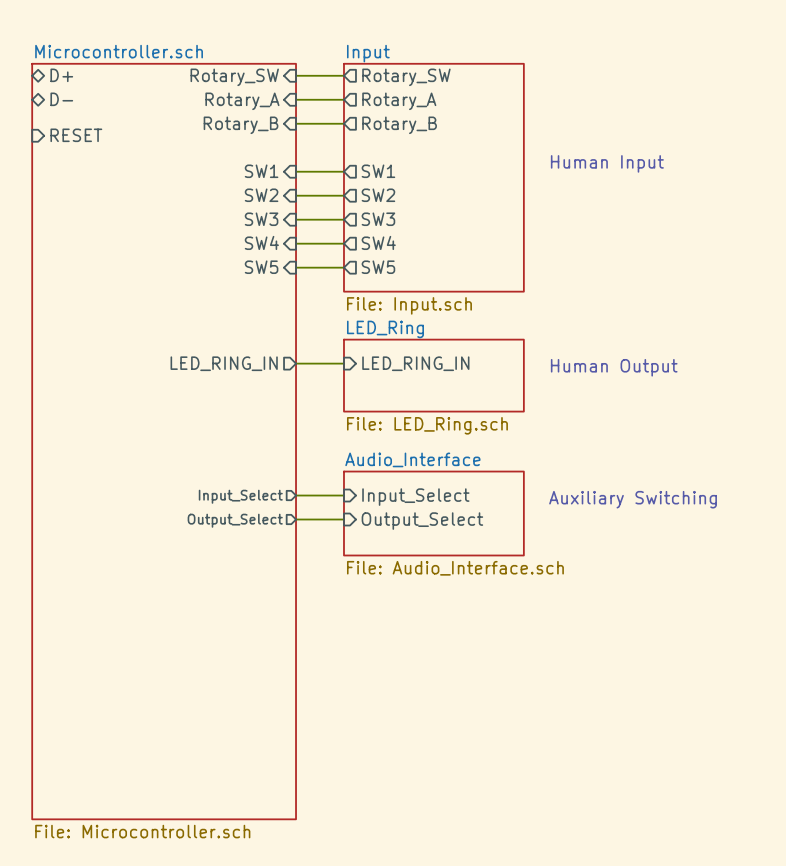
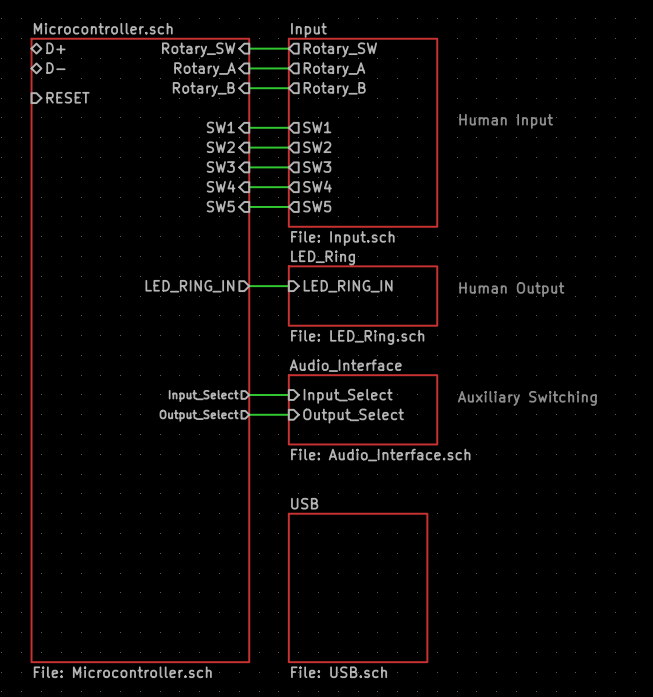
sheet USB: none -> File: USB.sch (358, 587)

